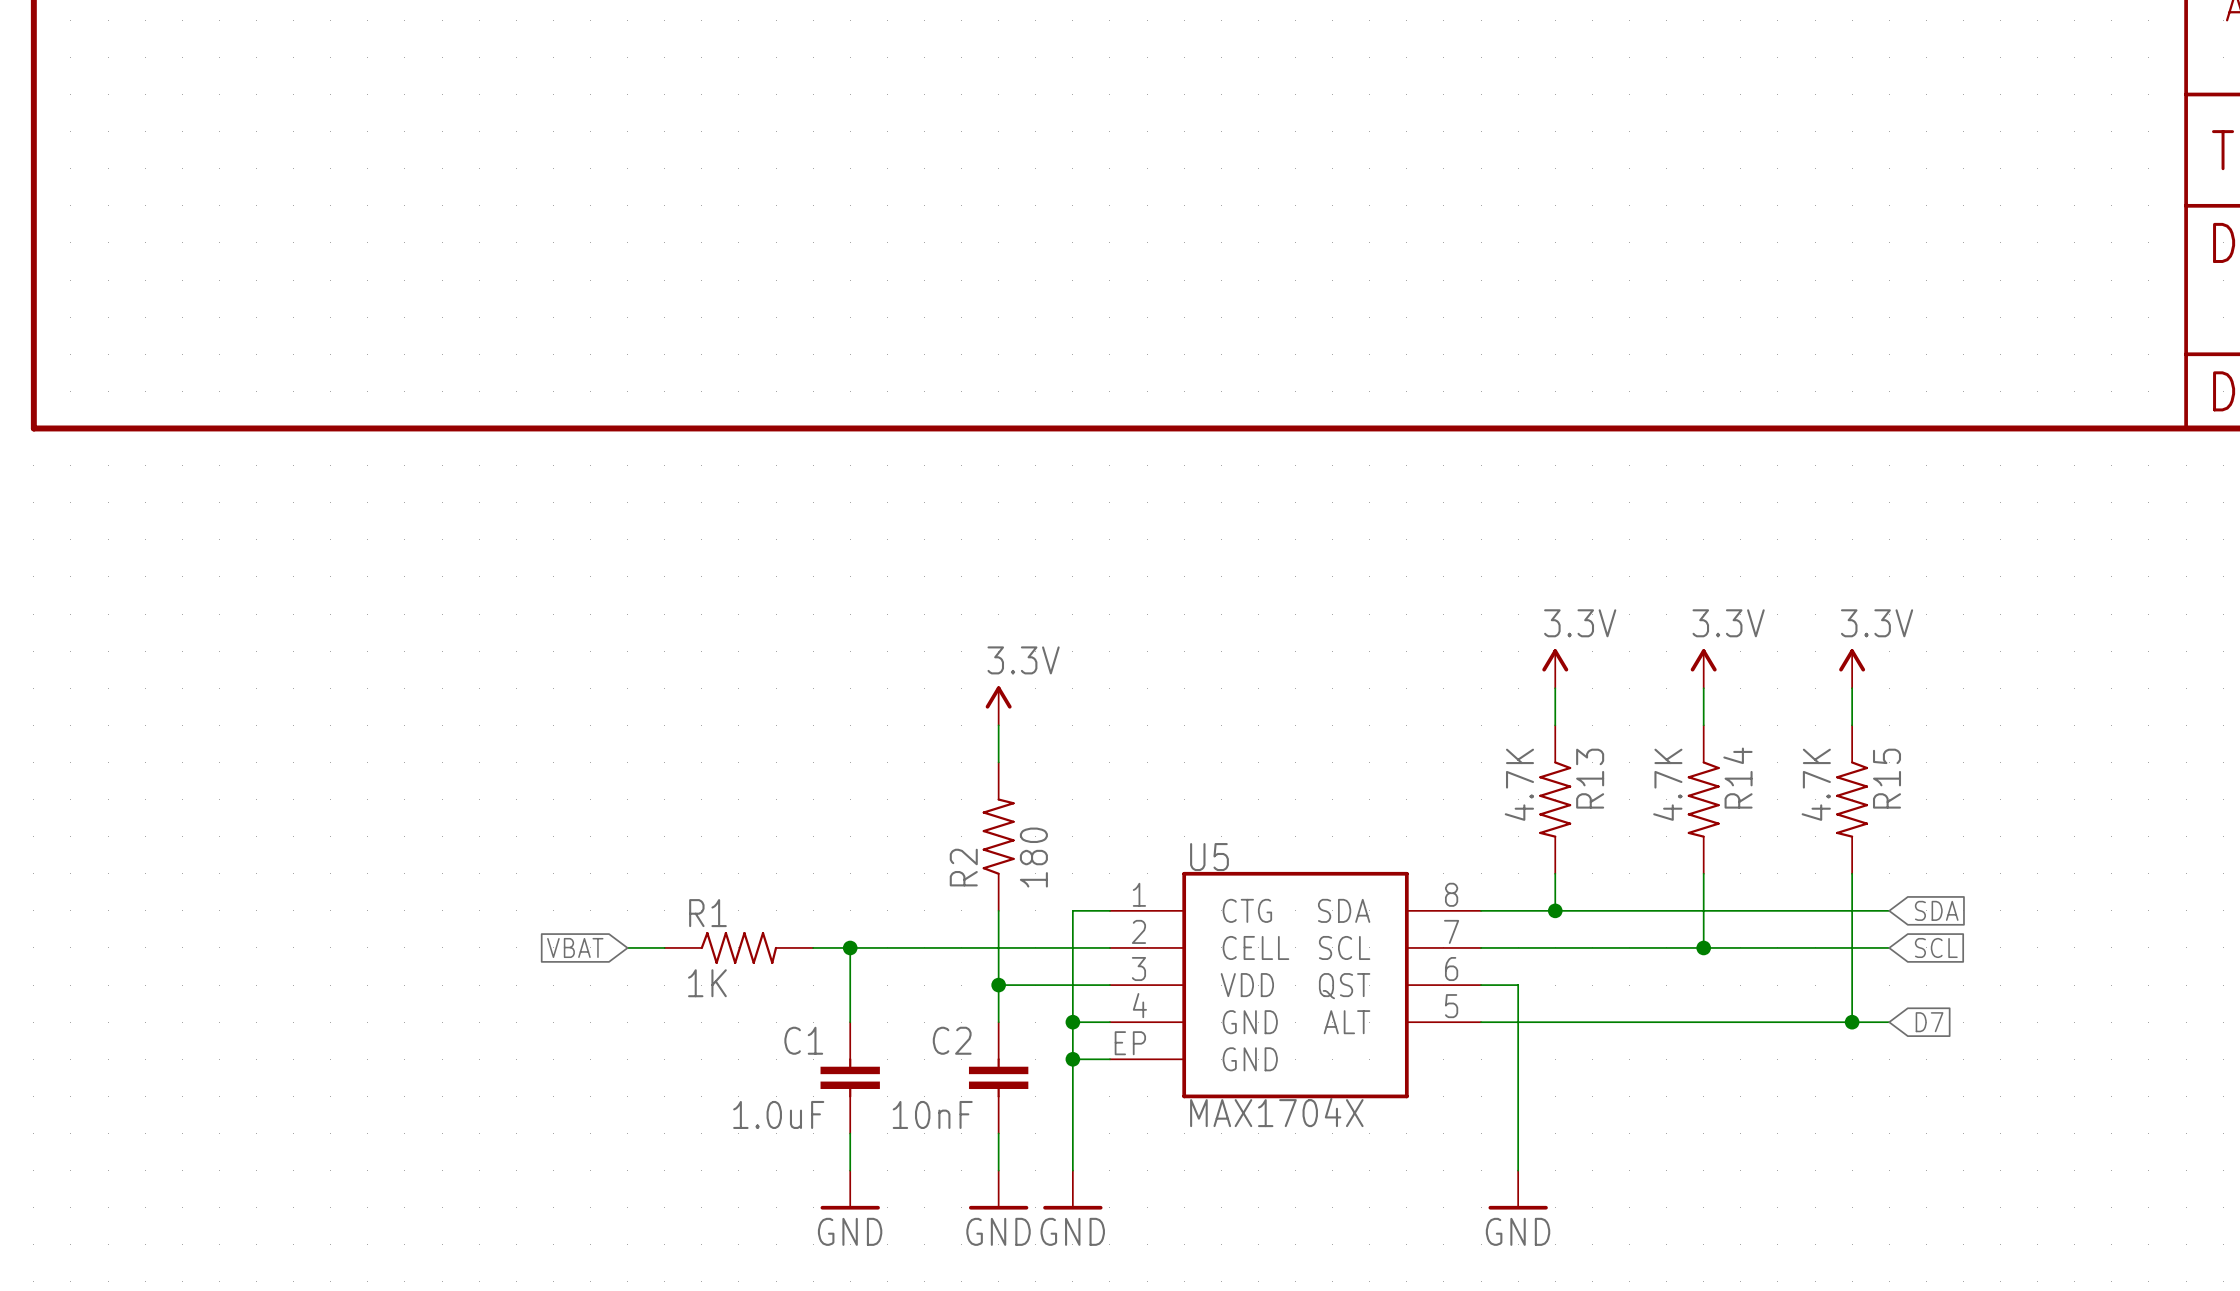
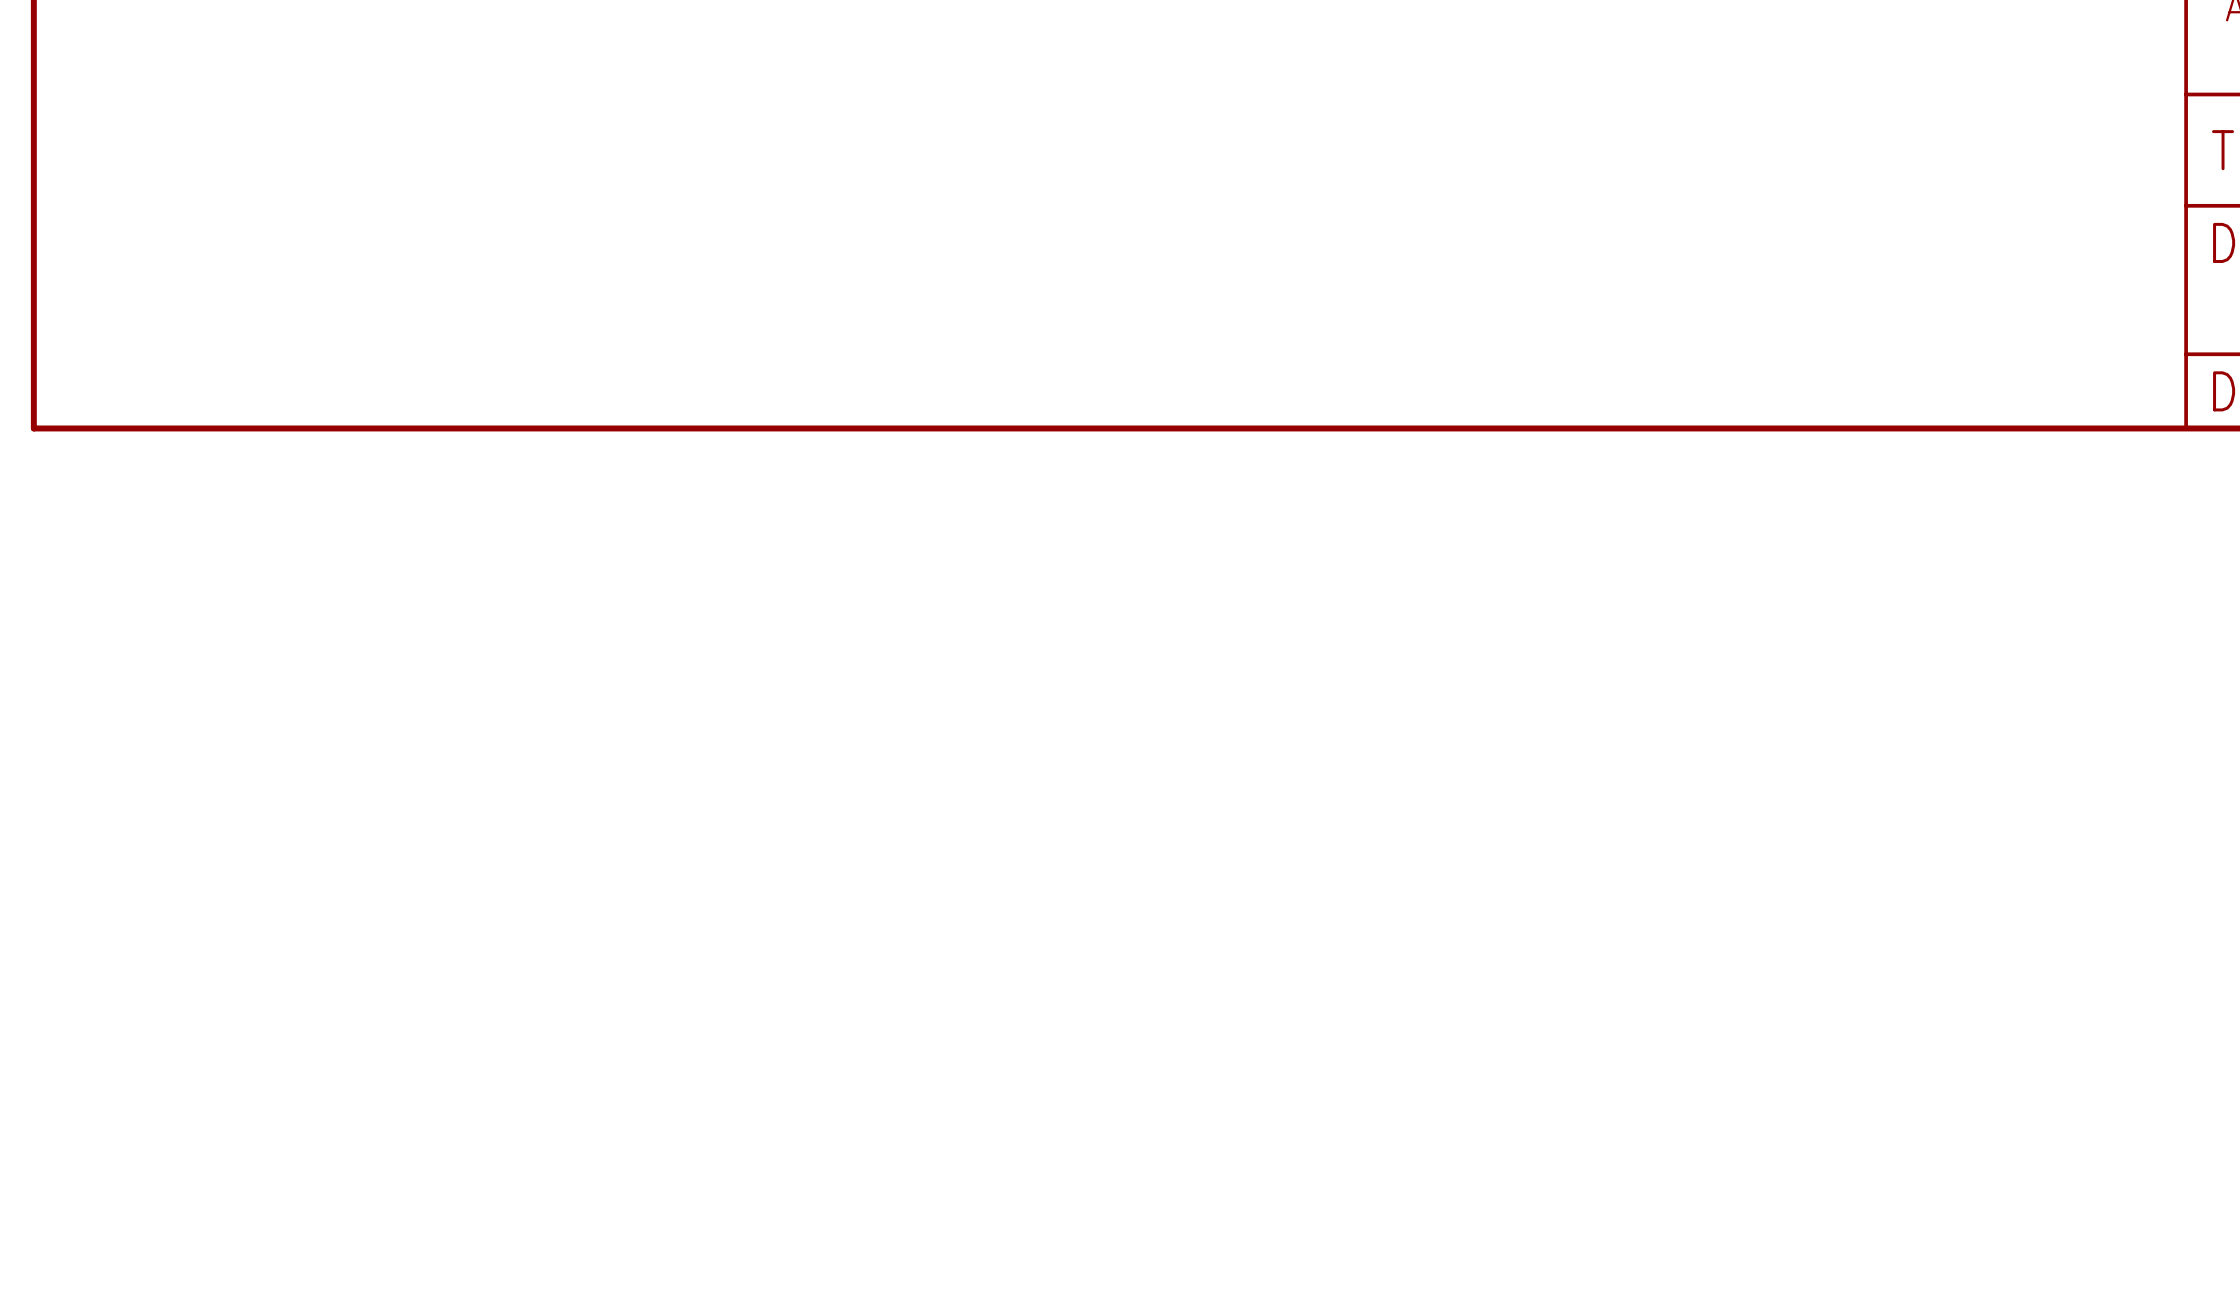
power symbol: 3.3V (1555, 668) -> none
power symbol: 3.3V (1703, 668) -> none
power symbol: 3.3V (1852, 668) -> none
wire: (1555, 688) (1555, 725) -> none
wire: (1703, 688) (1703, 725) -> none
wire: (1852, 688) (1852, 725) -> none
power symbol: 3.3V (998, 705) -> none
wire: (998, 725) (998, 762) -> none
R13: 4.7K (1555, 799) -> none
R14: 4.7K (1703, 799) -> none
R15: 4.7K (1852, 799) -> none
R2: 180 (998, 836) -> none
wire: (1555, 873) (1555, 910) -> none
wire: (1703, 873) (1703, 947) -> none
wire: (1852, 873) (1852, 1022) -> none
wire: (998, 910) (998, 1022) -> none
wire: (1109, 910) (1072, 910) (1072, 1170) -> none
wire: (1481, 910) (1889, 910) -> none
junction: (1555, 910) -> none
global label: SDA (1936, 910) -> none
global label: VBAT (575, 947) -> none
wire: (627, 947) (664, 947) -> none
R1: 1K (738, 947) -> none
wire: (813, 947) (1109, 947) -> none
wire: (850, 947) (850, 1022) -> none
junction: (850, 947) -> none
wire: (1481, 947) (1889, 947) -> none
junction: (1703, 947) -> none
global label: SCL (1936, 947) -> none
wire: (998, 985) (1109, 985) -> none
junction: (998, 985) -> none
U5: MAX1704X (1295, 985) -> none
wire: (1481, 985) (1518, 985) (1518, 1170) -> none
wire: (1072, 1022) (1109, 1022) -> none
junction: (1072, 1022) -> none
wire: (1481, 1022) (1889, 1022) -> none
junction: (1852, 1022) -> none
global label: D7 (1929, 1022) -> none
wire: (1072, 1059) (1109, 1059) -> none
junction: (1072, 1059) -> none
C1: 1.0uF (850, 1077) -> none
C2: 10nF (998, 1077) -> none
wire: (850, 1133) (850, 1170) -> none
wire: (998, 1133) (998, 1170) -> none
power symbol: GND (850, 1190) -> none
power symbol: GND (998, 1190) -> none
power symbol: GND (1072, 1190) -> none
power symbol: GND (1518, 1190) -> none

